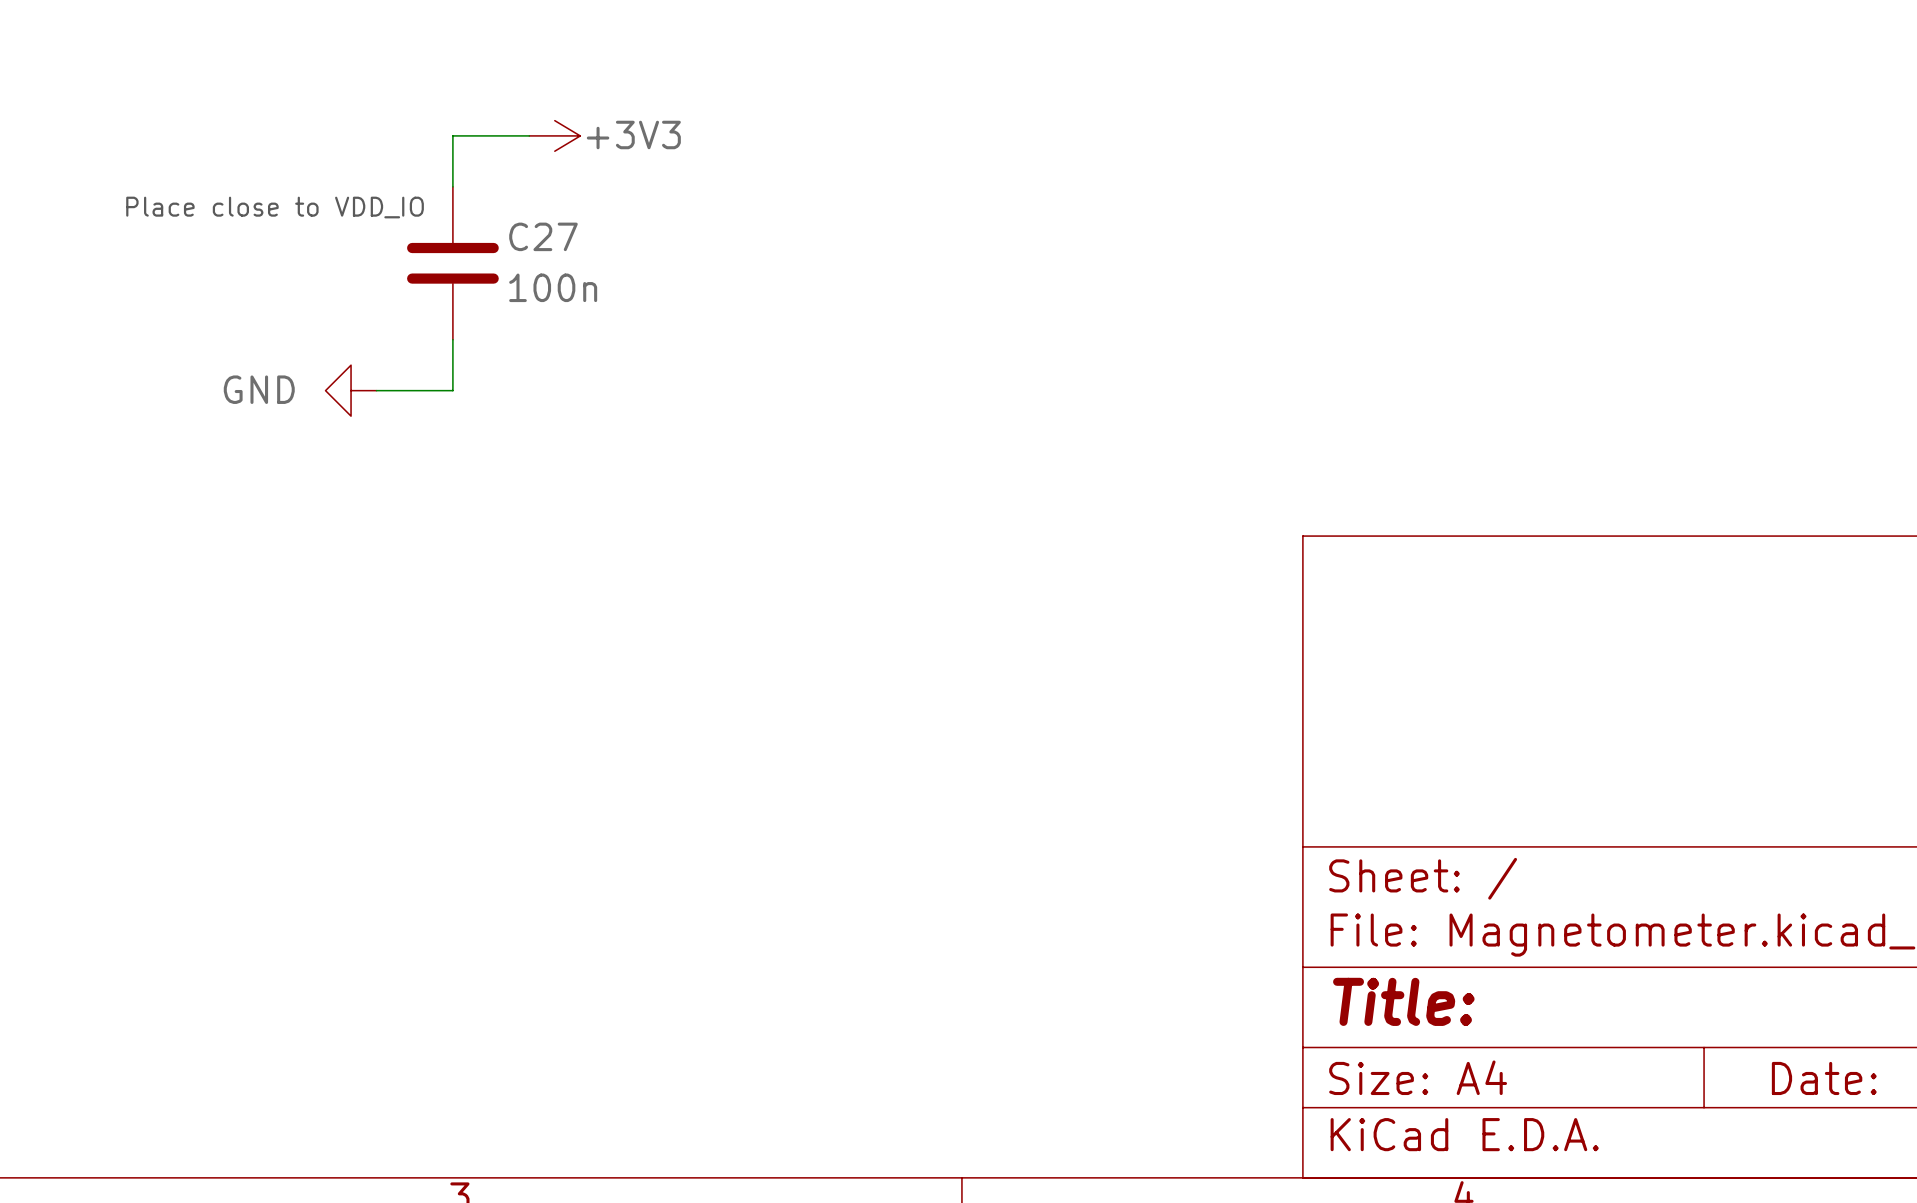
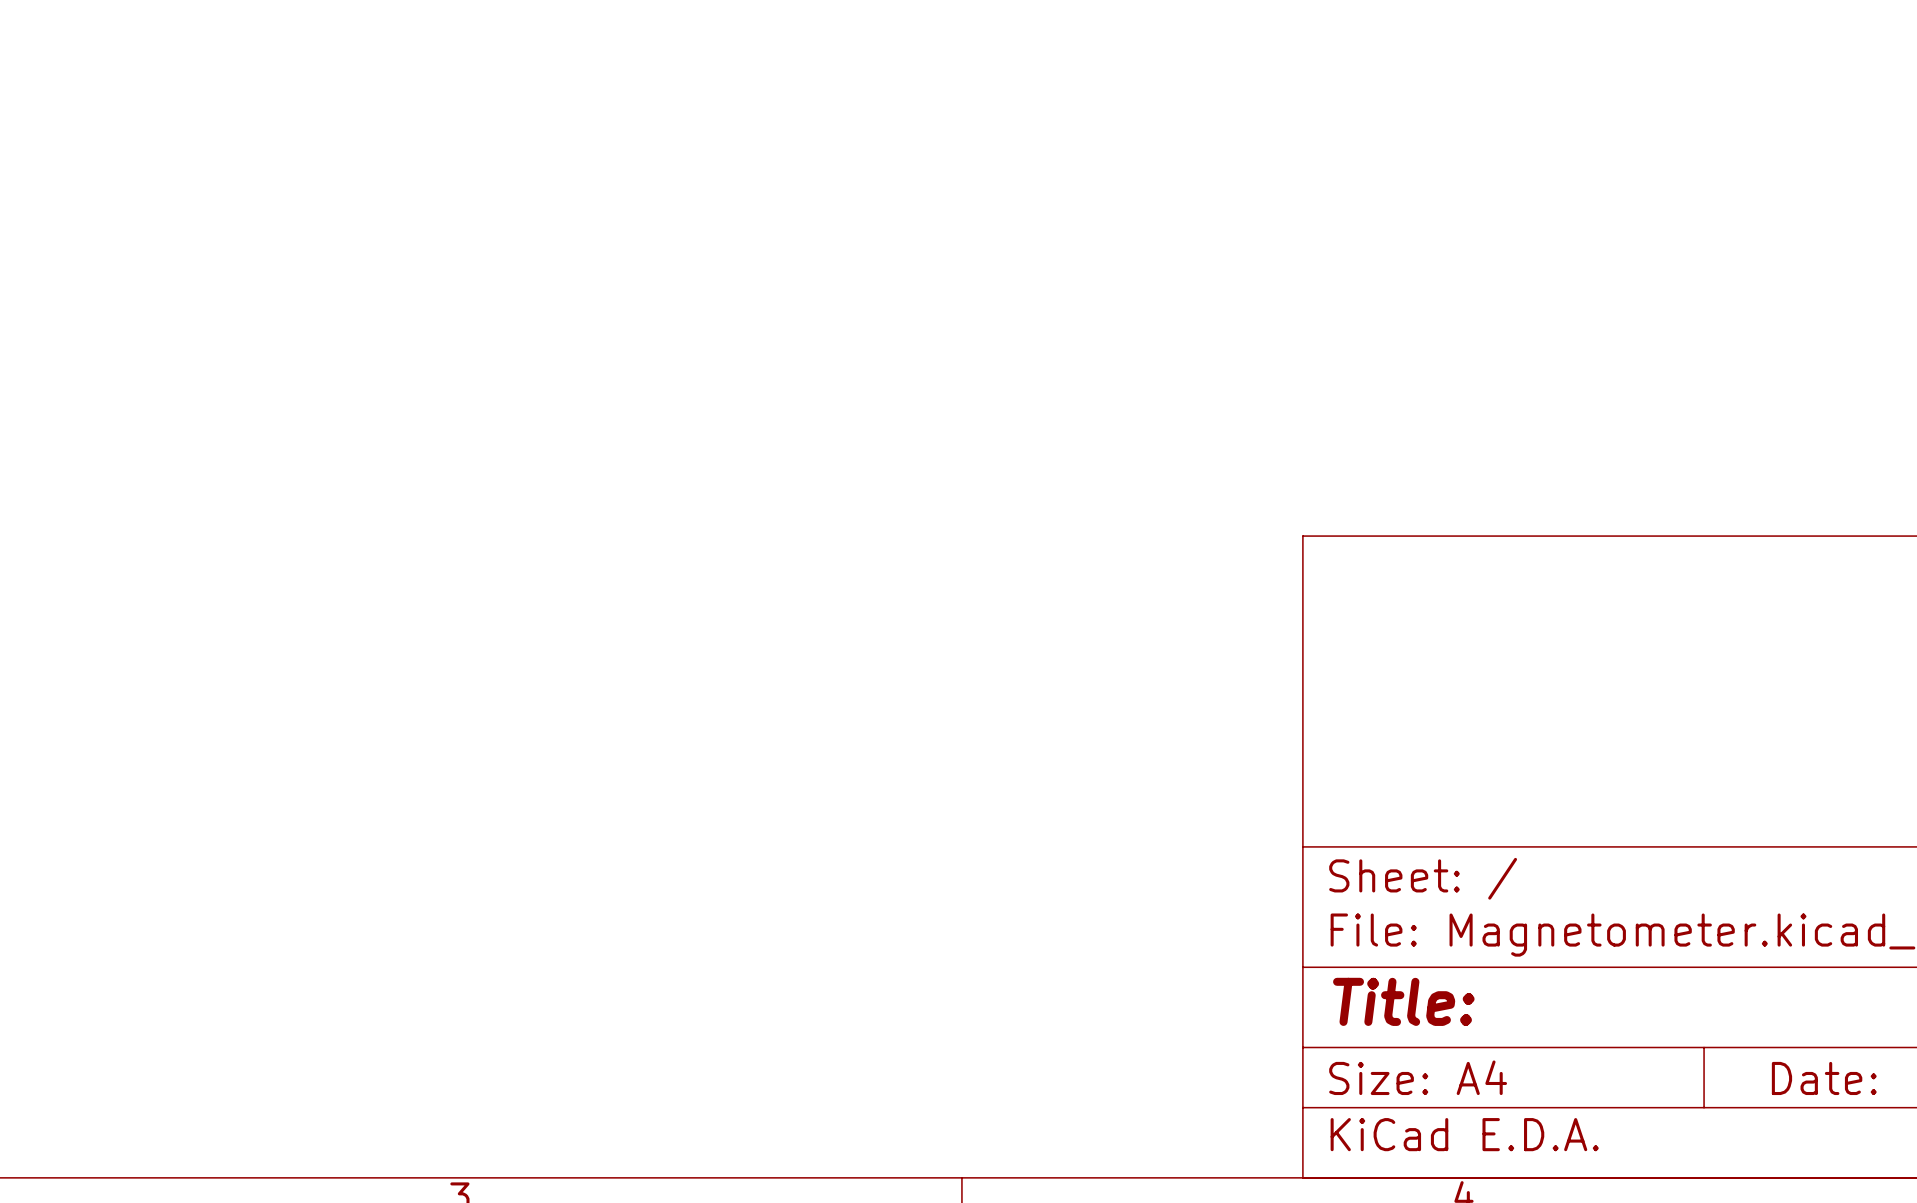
wire: (529, 135) (452, 135) (452, 186) -> none
power symbol: +3V3 (554, 135) -> none
text: Place close to VDD_IO (275, 207) -> none
C27: 100n (452, 263) -> none
wire: (452, 339) (452, 390) (376, 390) -> none
power symbol: GND (351, 390) -> none

